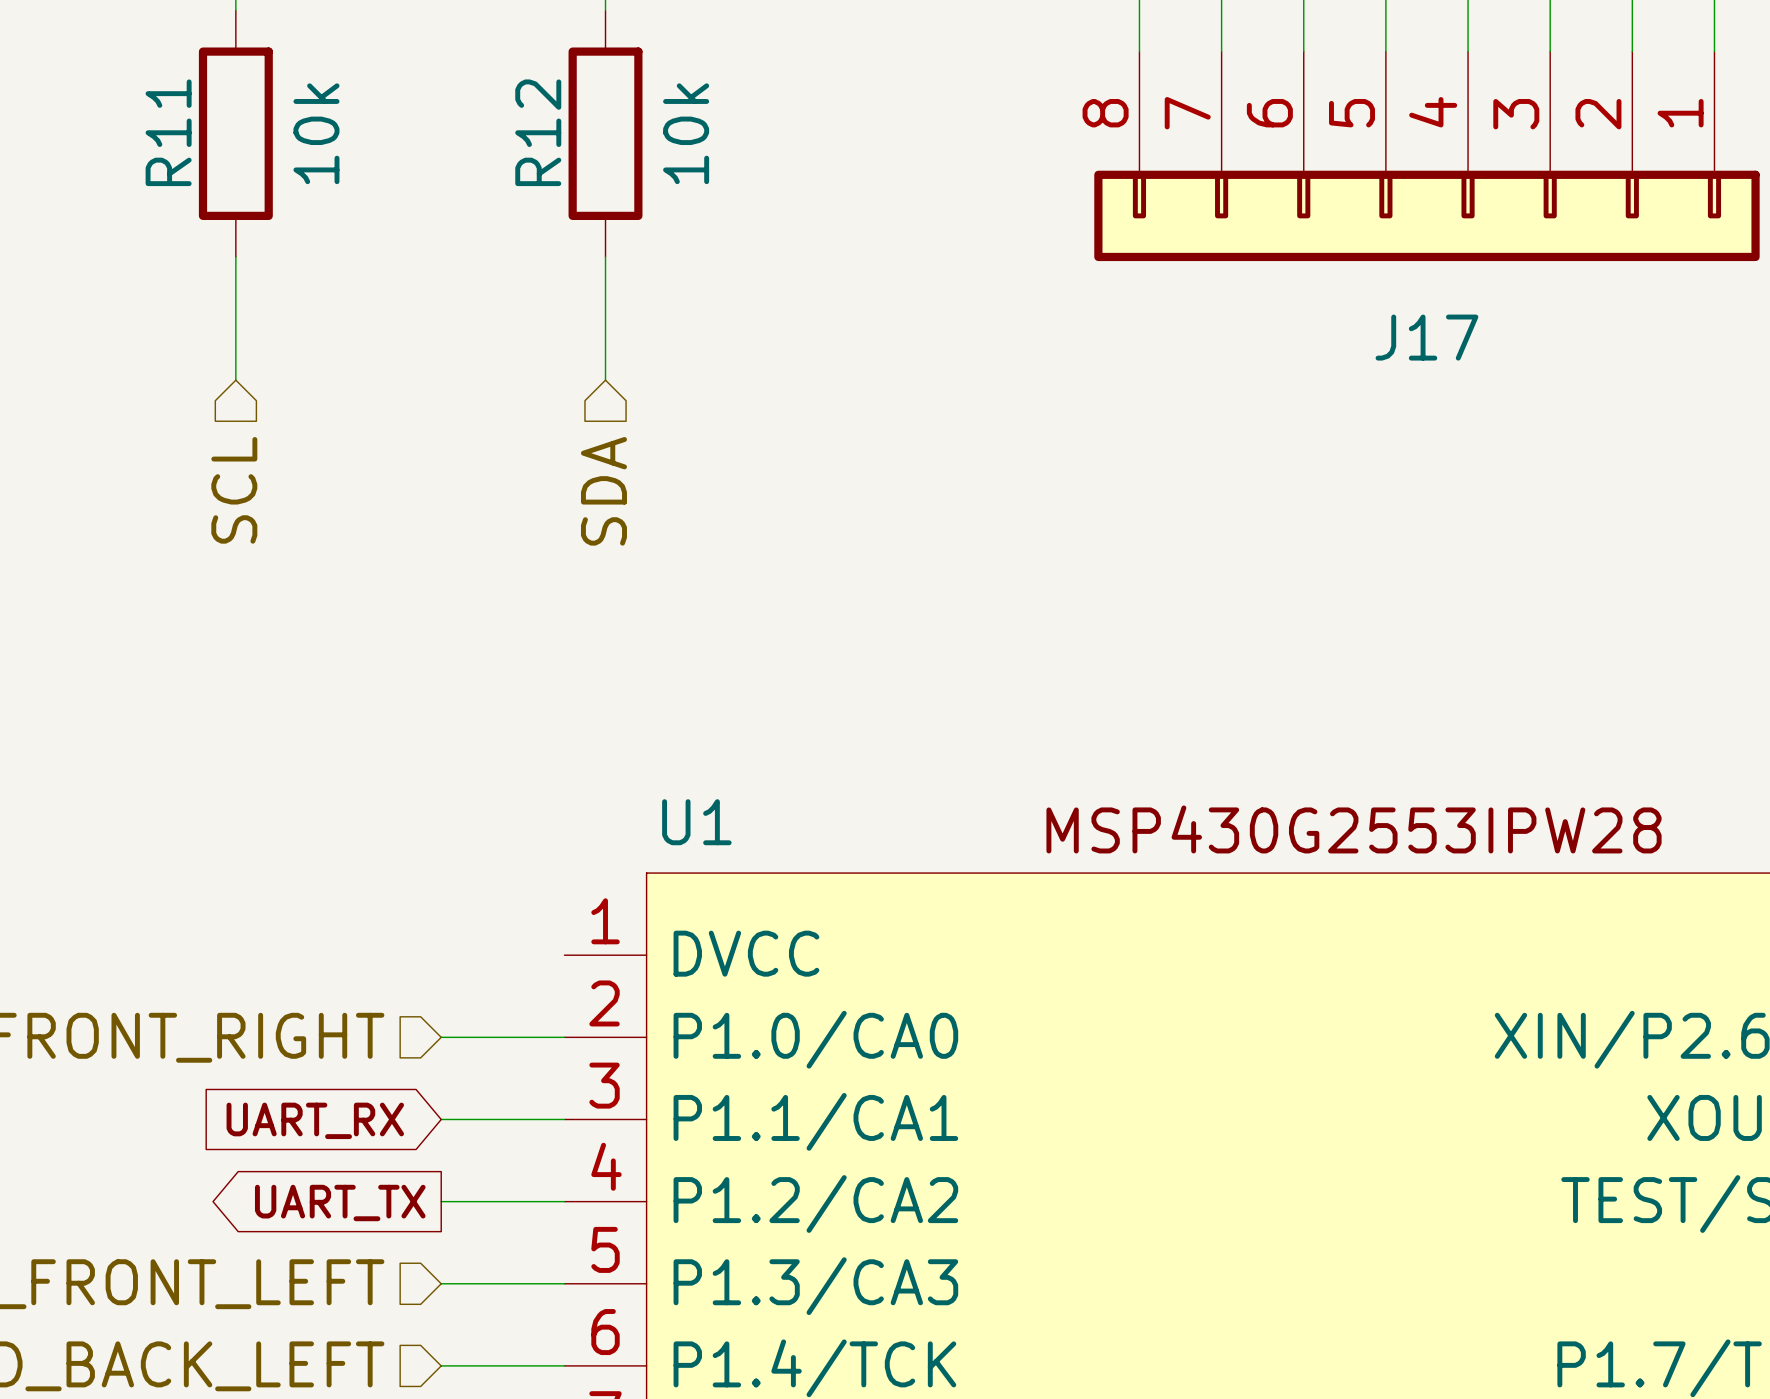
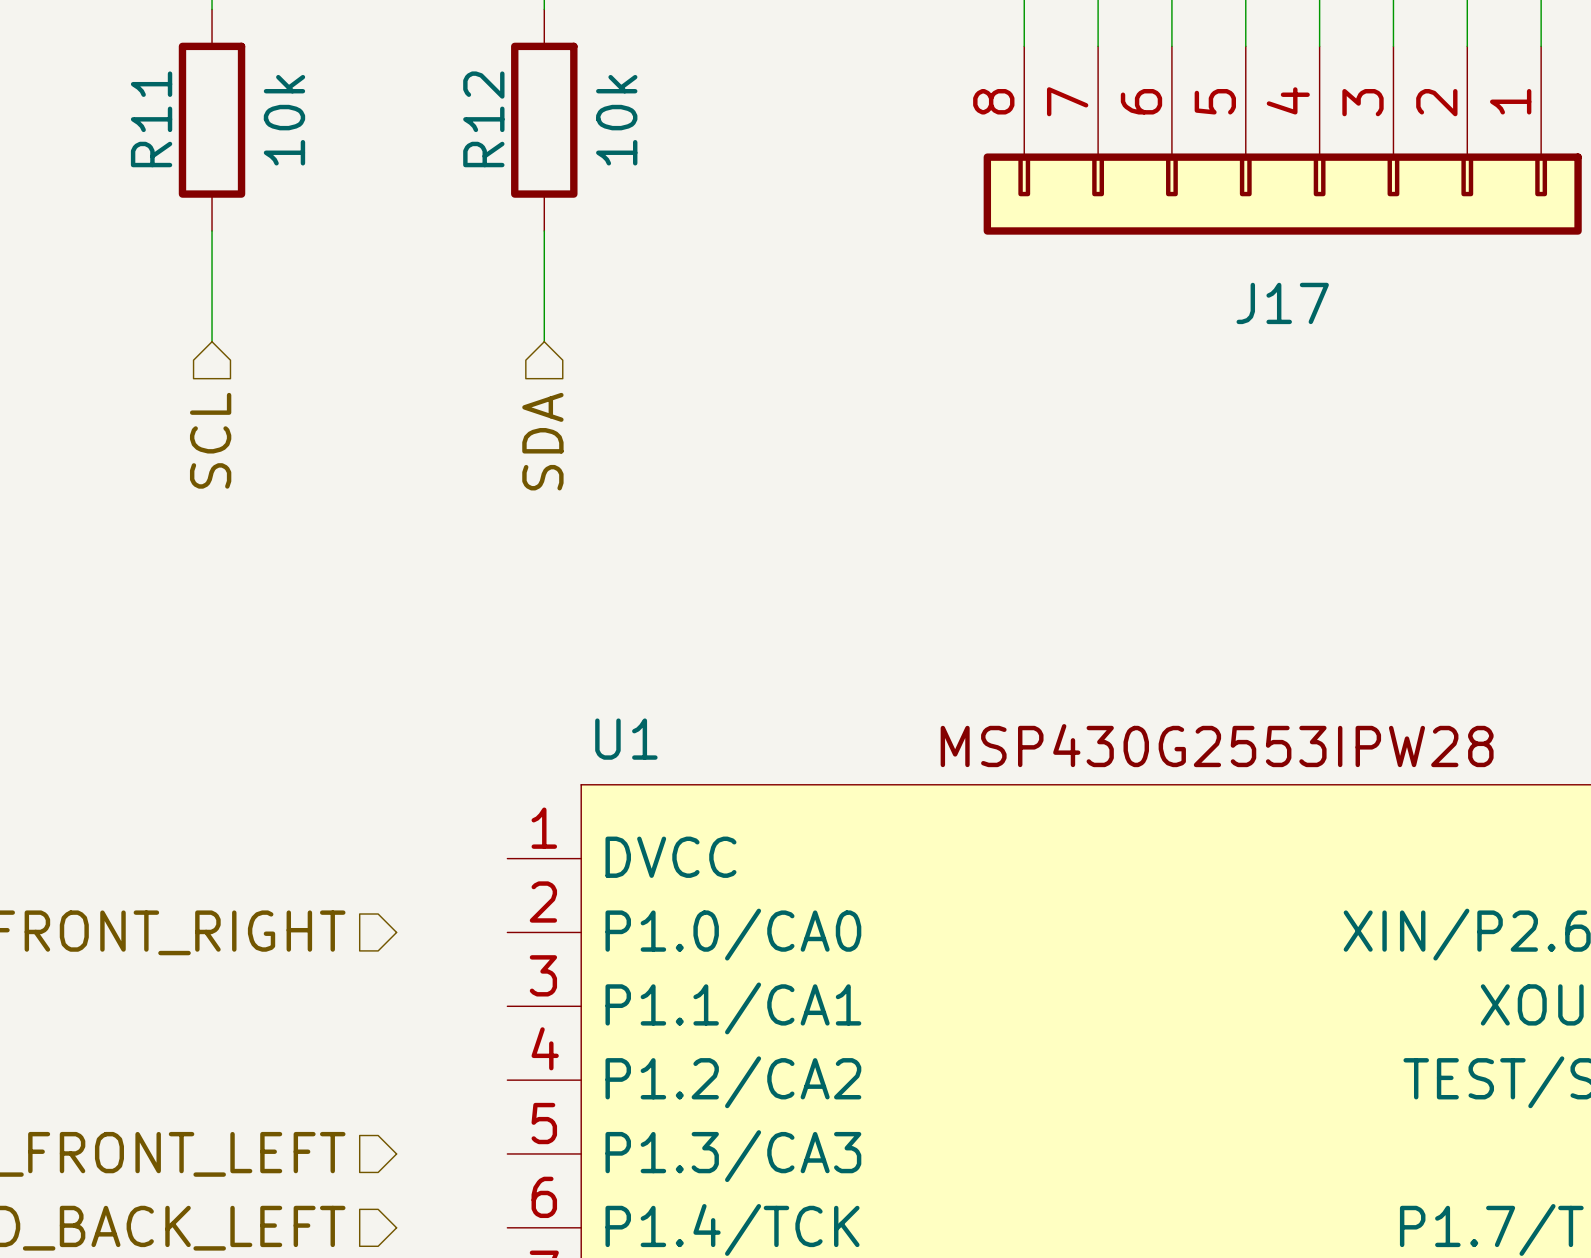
wire: (441, 1037) (564, 1037) -> none
wire: (441, 1119) (564, 1119) -> none
global label: UART_RX (315, 1120) -> none
wire: (441, 1201) (564, 1201) -> none
global label: UART_TX (340, 1203) -> none
wire: (441, 1283) (564, 1283) -> none
wire: (441, 1365) (564, 1365) -> none

